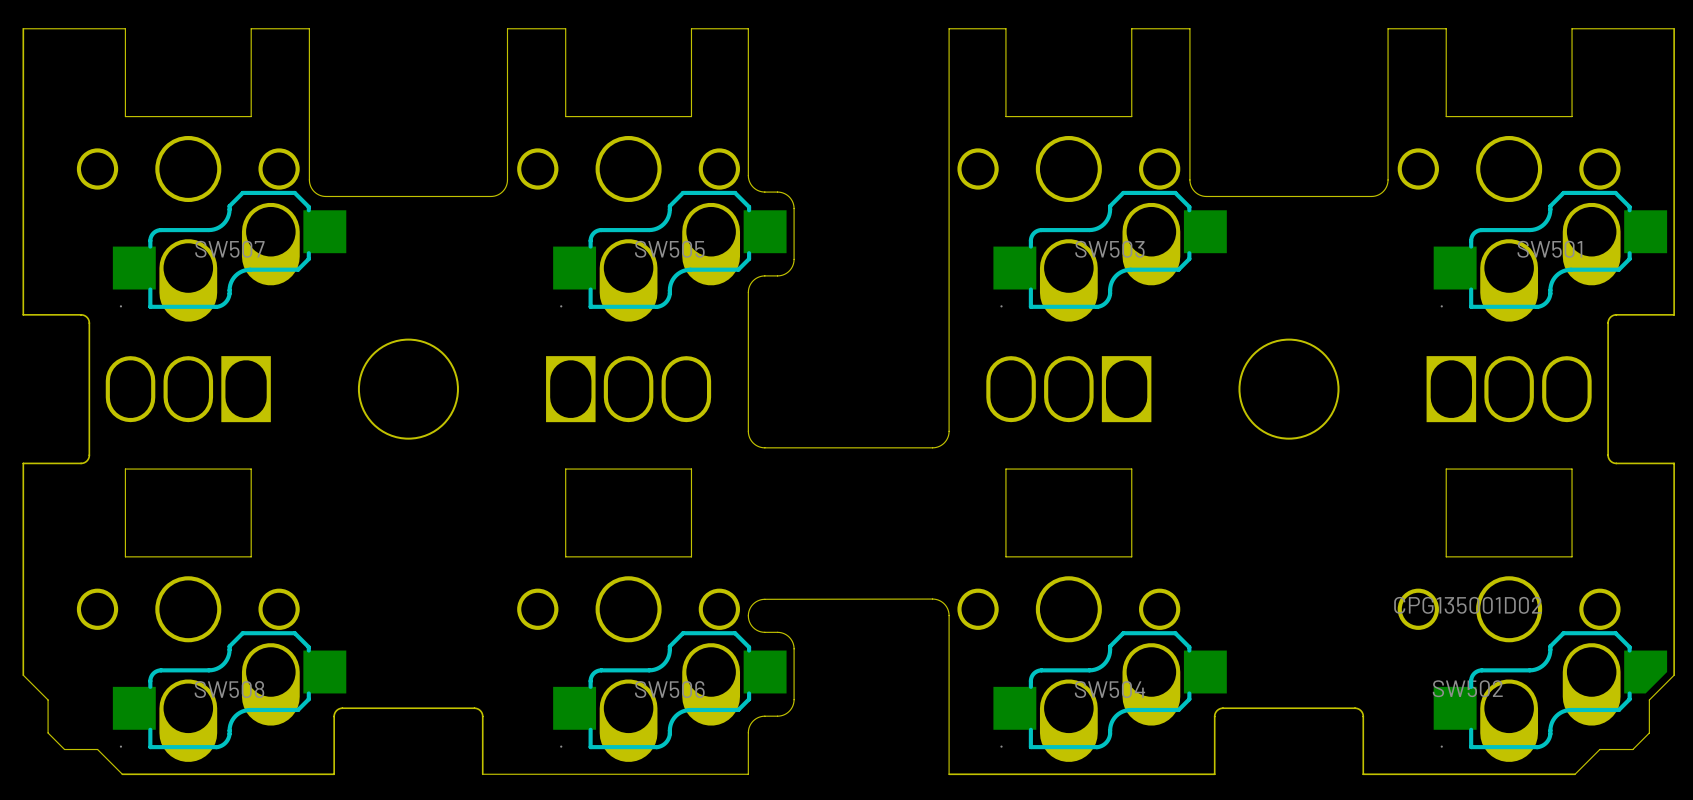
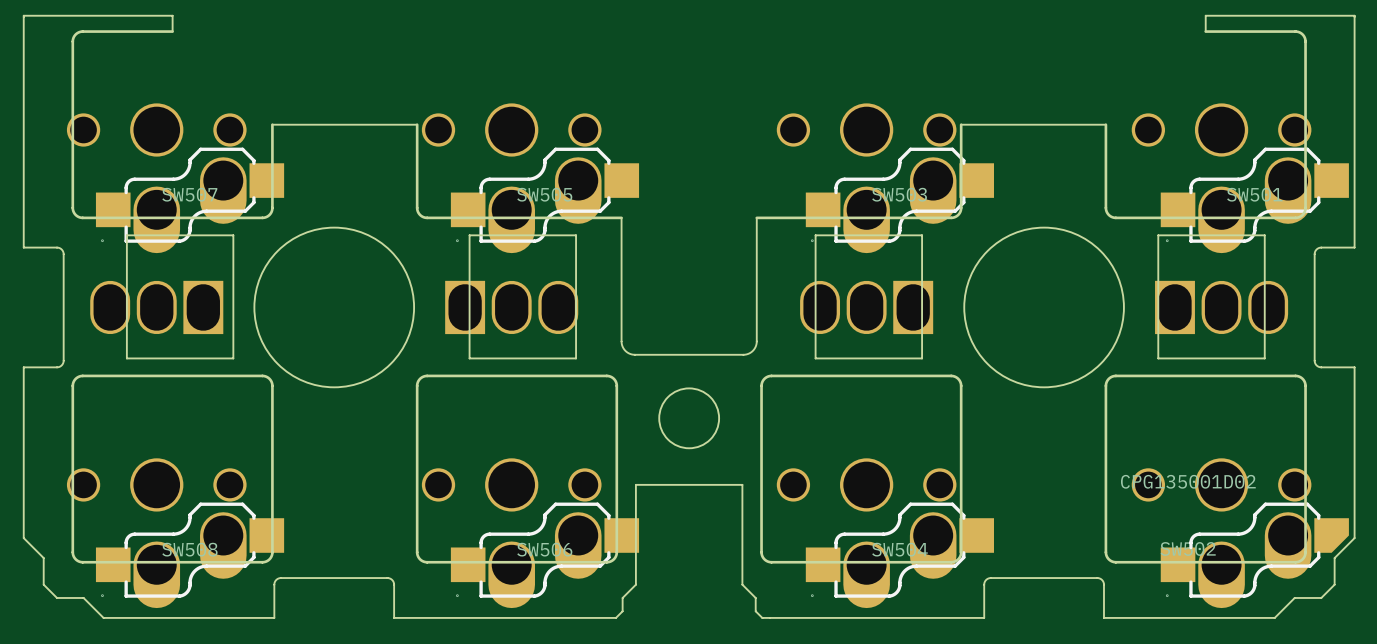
board edge: (23, 28) (125, 28) (125, 116) (251, 116) (251, 28) (309, 28) (309, 181) (315, 192) (325, 196) (490, 196) (502, 191) (507, 179) (507, 28) (565, 28) (565, 116) (691, 116) (691, 28) (748, 28) (748, 179) (753, 187) (759, 191) (779, 192) (786, 194) (792, 201) (794, 208) (794, 259) (791, 268) (781, 275) (757, 277) (751, 282) (748, 288) (748, 433) (750, 440) (757, 446) (781, 447) -> (23, 16) (172, 15) (172, 31) (81, 31) (73, 37) (72, 207) (77, 216) (265, 217) (270, 213) (272, 209) (272, 124) (417, 124) (417, 209) (423, 217) (621, 217) (621, 342) (625, 350) (634, 354)
board edge: (1674, 28) (1572, 28) (1572, 116) (1446, 116) (1446, 28) (1388, 28) (1387, 181) (1383, 191) (1371, 196) (1206, 196) (1194, 191) (1189, 179) (1189, 28) (1131, 28) (1131, 116) (1005, 116) (1005, 28) (949, 28) (948, 433) (945, 441) (939, 446) (916, 447) -> (1354, 16) (1205, 15) (1205, 31) (1296, 31) (1304, 37) (1305, 207) (1300, 216) (1113, 217) (1108, 214) (1105, 209) (1105, 124) (961, 124) (961, 209) (955, 217) (756, 217) (756, 342) (752, 350) (743, 354)
board edge: none -> (233, 235) (126, 235) (126, 358) (233, 358) (233, 235)
board edge: none -> (576, 235) (469, 235) (469, 358) (576, 358) (576, 235)
board edge: none -> (922, 235) (815, 235) (815, 358) (922, 358) (922, 235)
board edge: none -> (1264, 235) (1158, 235) (1158, 358) (1264, 358) (1264, 235)
board edge: (64, 314) (83, 315) (87, 318) (89, 323) (89, 456) (83, 463) (64, 463) -> (57, 247) (61, 249) (63, 254) (63, 360) (61, 365) (57, 367)
board edge: (1632, 314) (1614, 315) (1609, 318) (1608, 323) (1608, 456) (1614, 463) (1632, 463) -> (1321, 247) (1316, 249) (1314, 254) (1314, 360) (1316, 365) (1321, 367)
round board edge size: [357, 338, 459, 440] -> [254, 227, 415, 388]
round board edge size: [1238, 338, 1340, 440] -> [963, 227, 1125, 388]
board edge: (251, 469) (125, 469) (125, 556) (251, 556) (251, 469) -> none
board edge: (691, 469) (565, 469) (565, 556) (691, 556) (691, 469) -> none
board edge: (1131, 469) (1005, 469) (1005, 556) (1131, 556) (1131, 469) -> none
board edge: (1572, 469) (1446, 469) (1446, 556) (1572, 556) (1572, 469) -> none
board edge: none -> (262, 375) (82, 375) (75, 378) (72, 385) (72, 552) (75, 559) (82, 562) (262, 562) (269, 559) (272, 552) (272, 385) (269, 378) (262, 375)
board edge: none -> (606, 375) (427, 375) (420, 378) (417, 385) (417, 552) (420, 559) (427, 562) (606, 562) (613, 559) (616, 552) (616, 385) (613, 378) (606, 375)
board edge: none -> (951, 375) (771, 375) (764, 378) (761, 385) (761, 552) (764, 559) (771, 562) (951, 562) (958, 559) (961, 552) (961, 385) (958, 378) (951, 375)
board edge: none -> (1295, 375) (1115, 375) (1108, 378) (1105, 385) (1105, 552) (1108, 559) (1115, 562) (1295, 562) (1302, 559) (1305, 552) (1305, 385) (1302, 378) (1295, 375)
round board edge: none -> [658, 388, 720, 449]
board edge: (482, 733) (482, 714) (479, 709) (474, 708) (341, 708) (334, 714) (334, 733) -> (394, 584) (392, 579) (387, 578) (280, 578) (276, 579) (274, 584)
board edge: (1363, 733) (1362, 714) (1360, 709) (1355, 708) (1221, 708) (1214, 714) (1214, 733) -> (1103, 584) (1102, 579) (1097, 578) (990, 578) (986, 579) (984, 584)
board edge: (949, 774) (948, 613) (944, 603) (932, 599) (764, 599) (753, 604) (748, 615) (753, 627) (762, 632) (783, 633) (792, 641) (794, 699) (791, 708) (786, 713) (779, 716) (759, 717) (750, 723) (748, 732) (748, 774) -> (770, 617) (762, 617) (755, 611) (755, 597) (742, 584) (742, 484) (635, 484) (635, 584) (622, 597) (622, 611) (615, 617) (608, 617)

